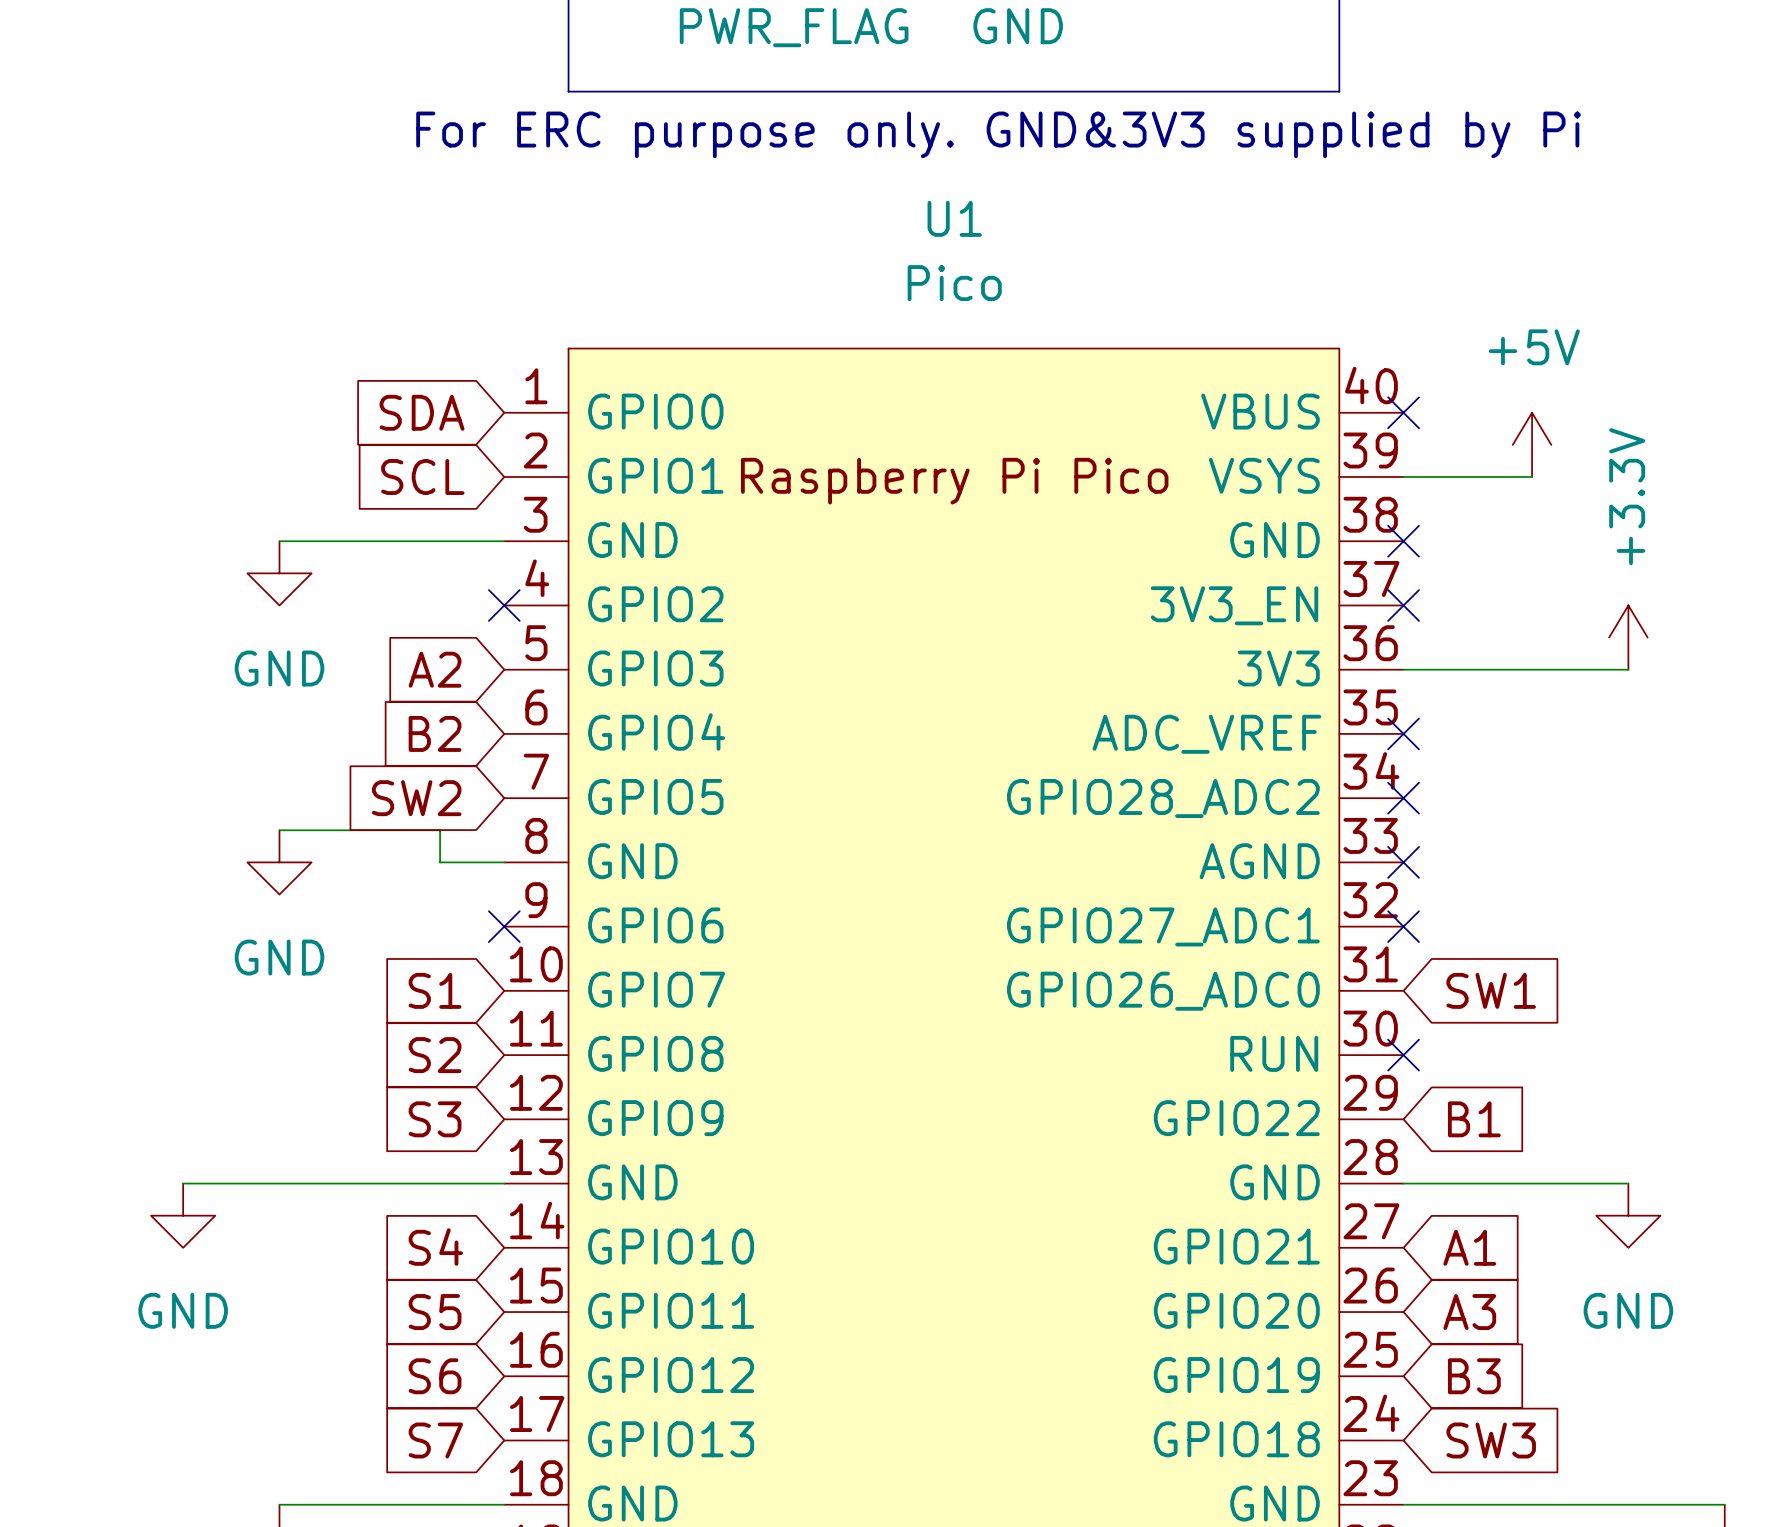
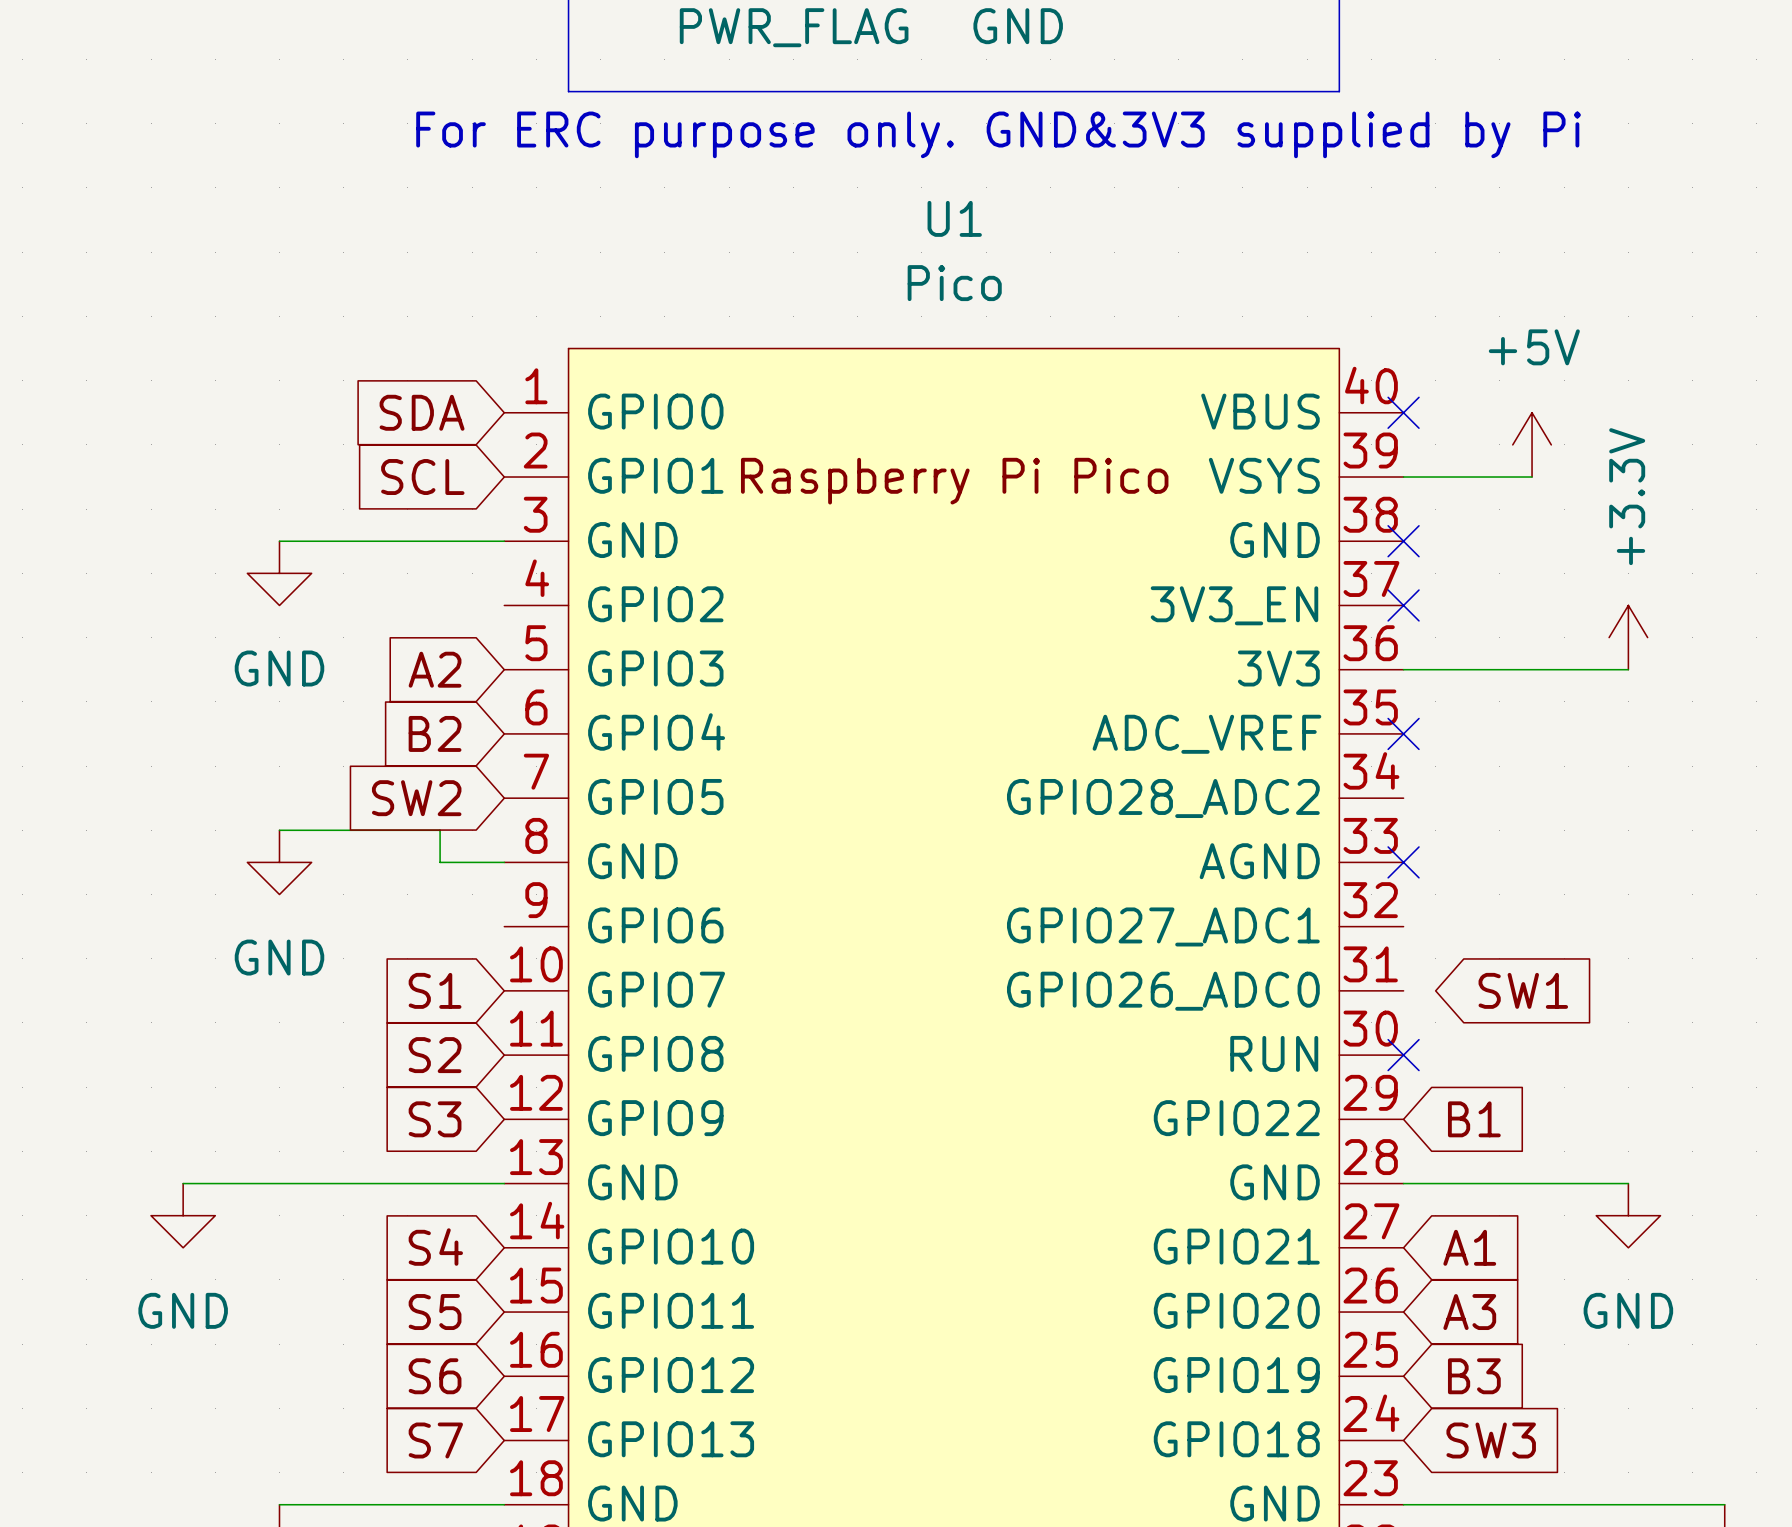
no-connect mark: (504, 605) -> none
no-connect mark: (1403, 798) -> none
no-connect mark: (504, 926) -> none
no-connect mark: (1403, 926) -> none
global label position: SW1 (1491, 990) -> SW1 (1523, 990)

